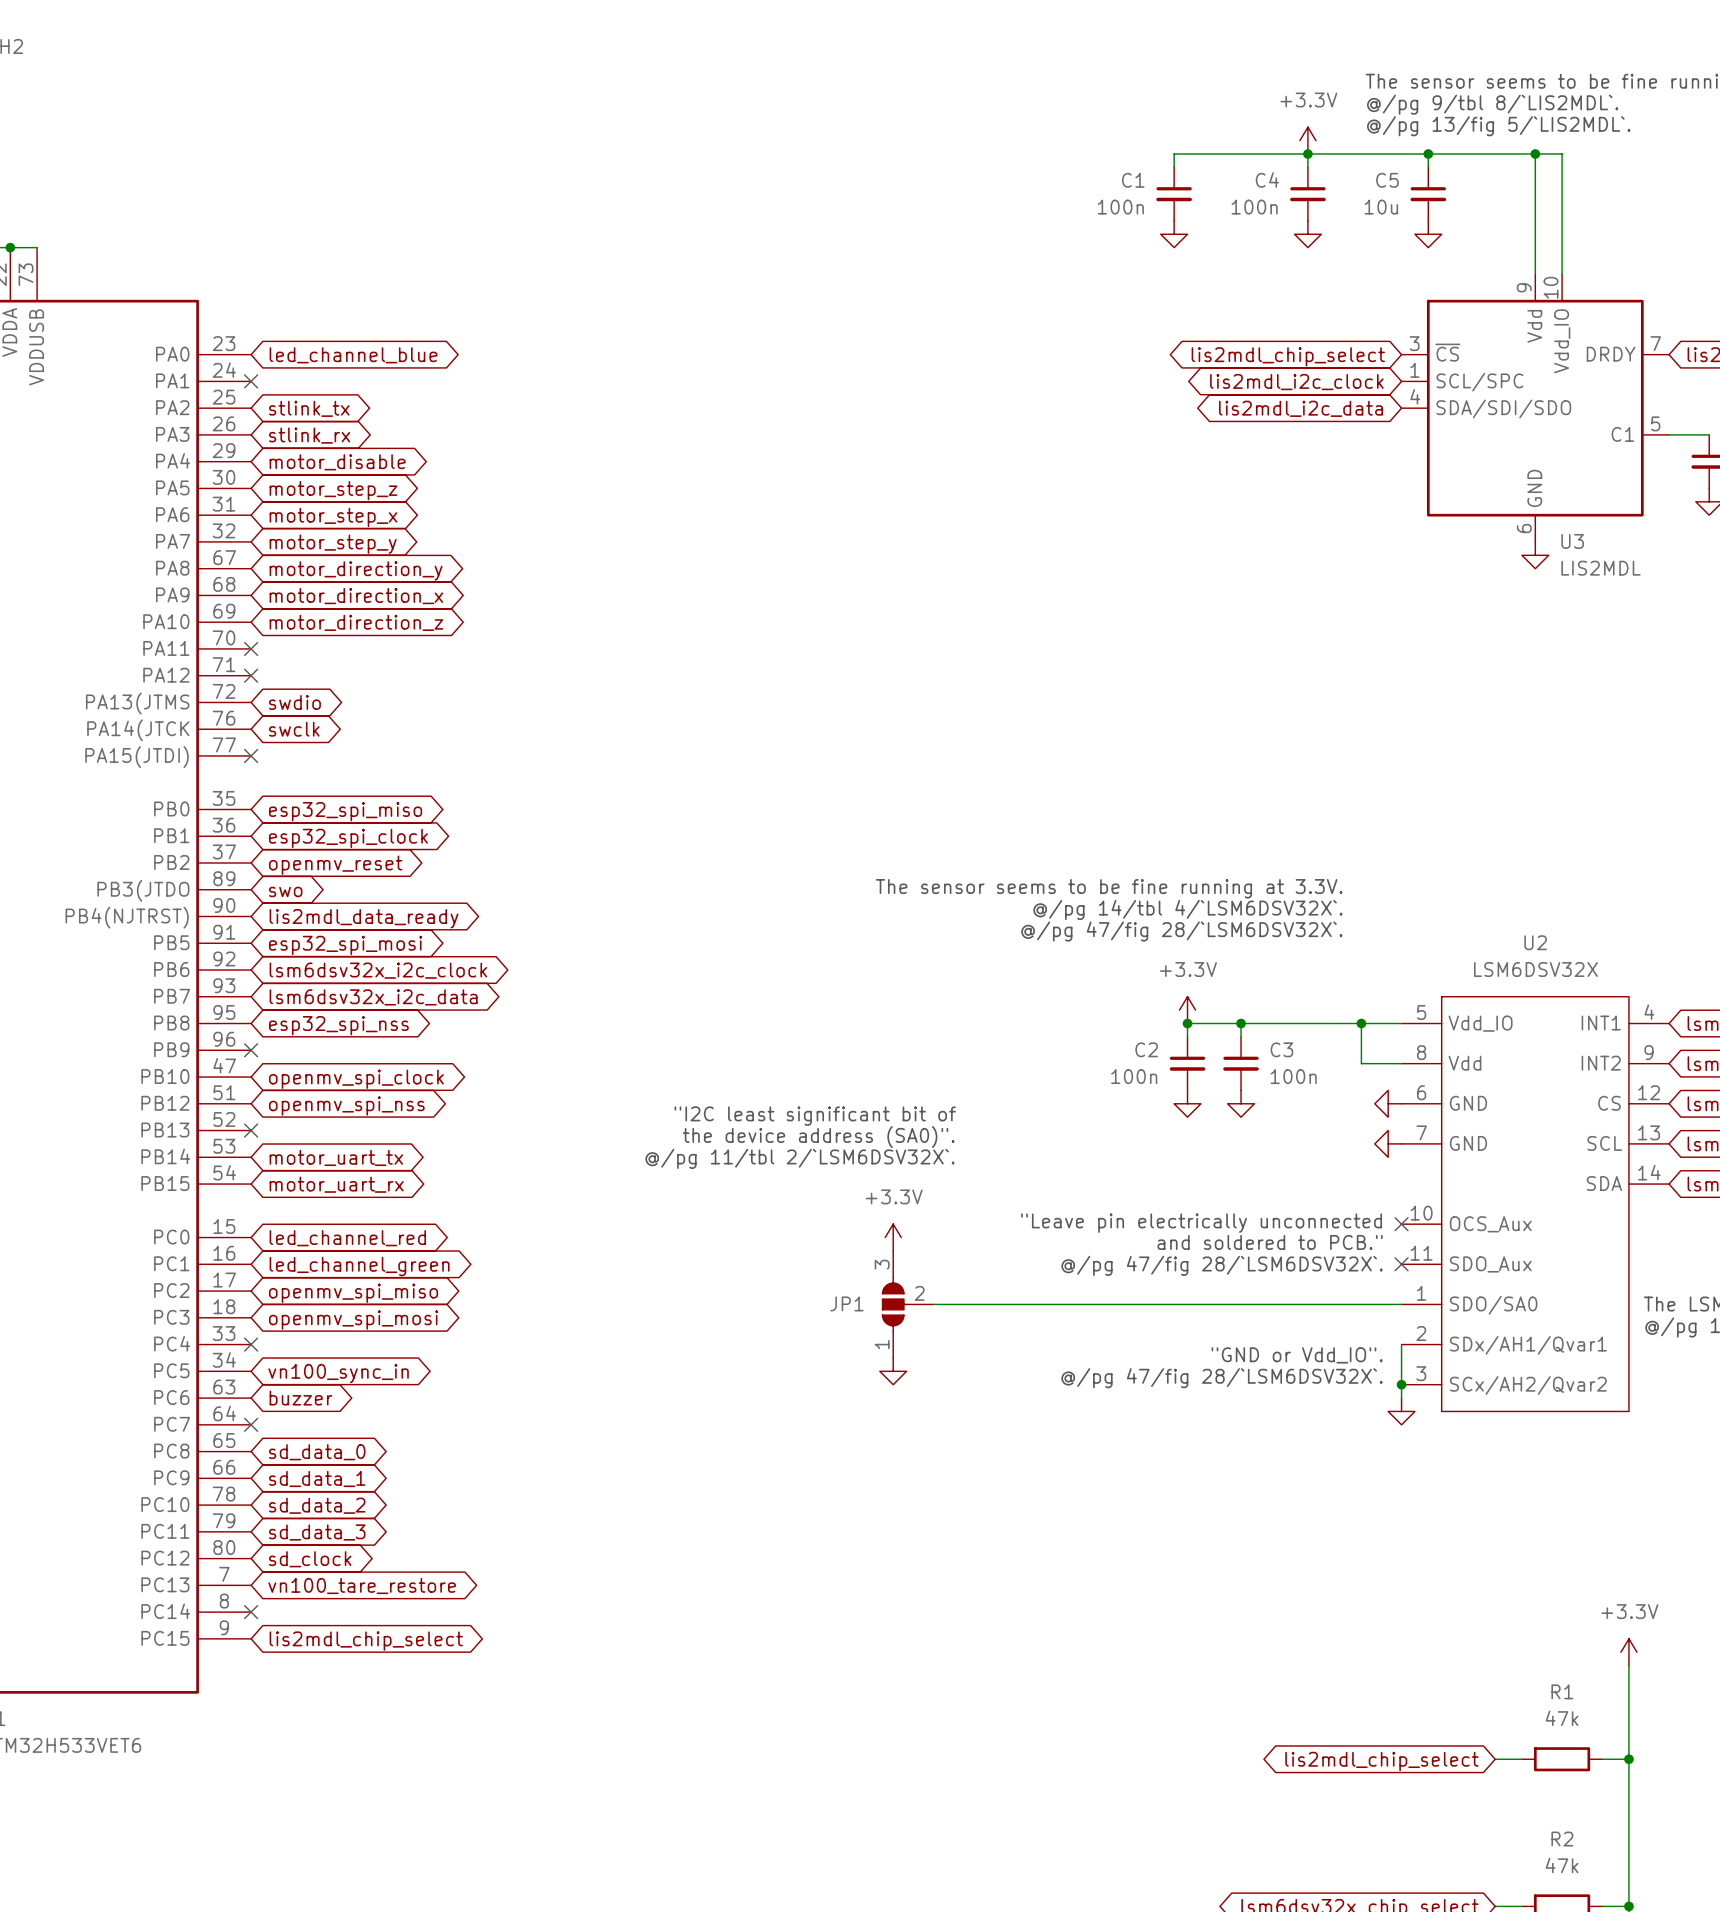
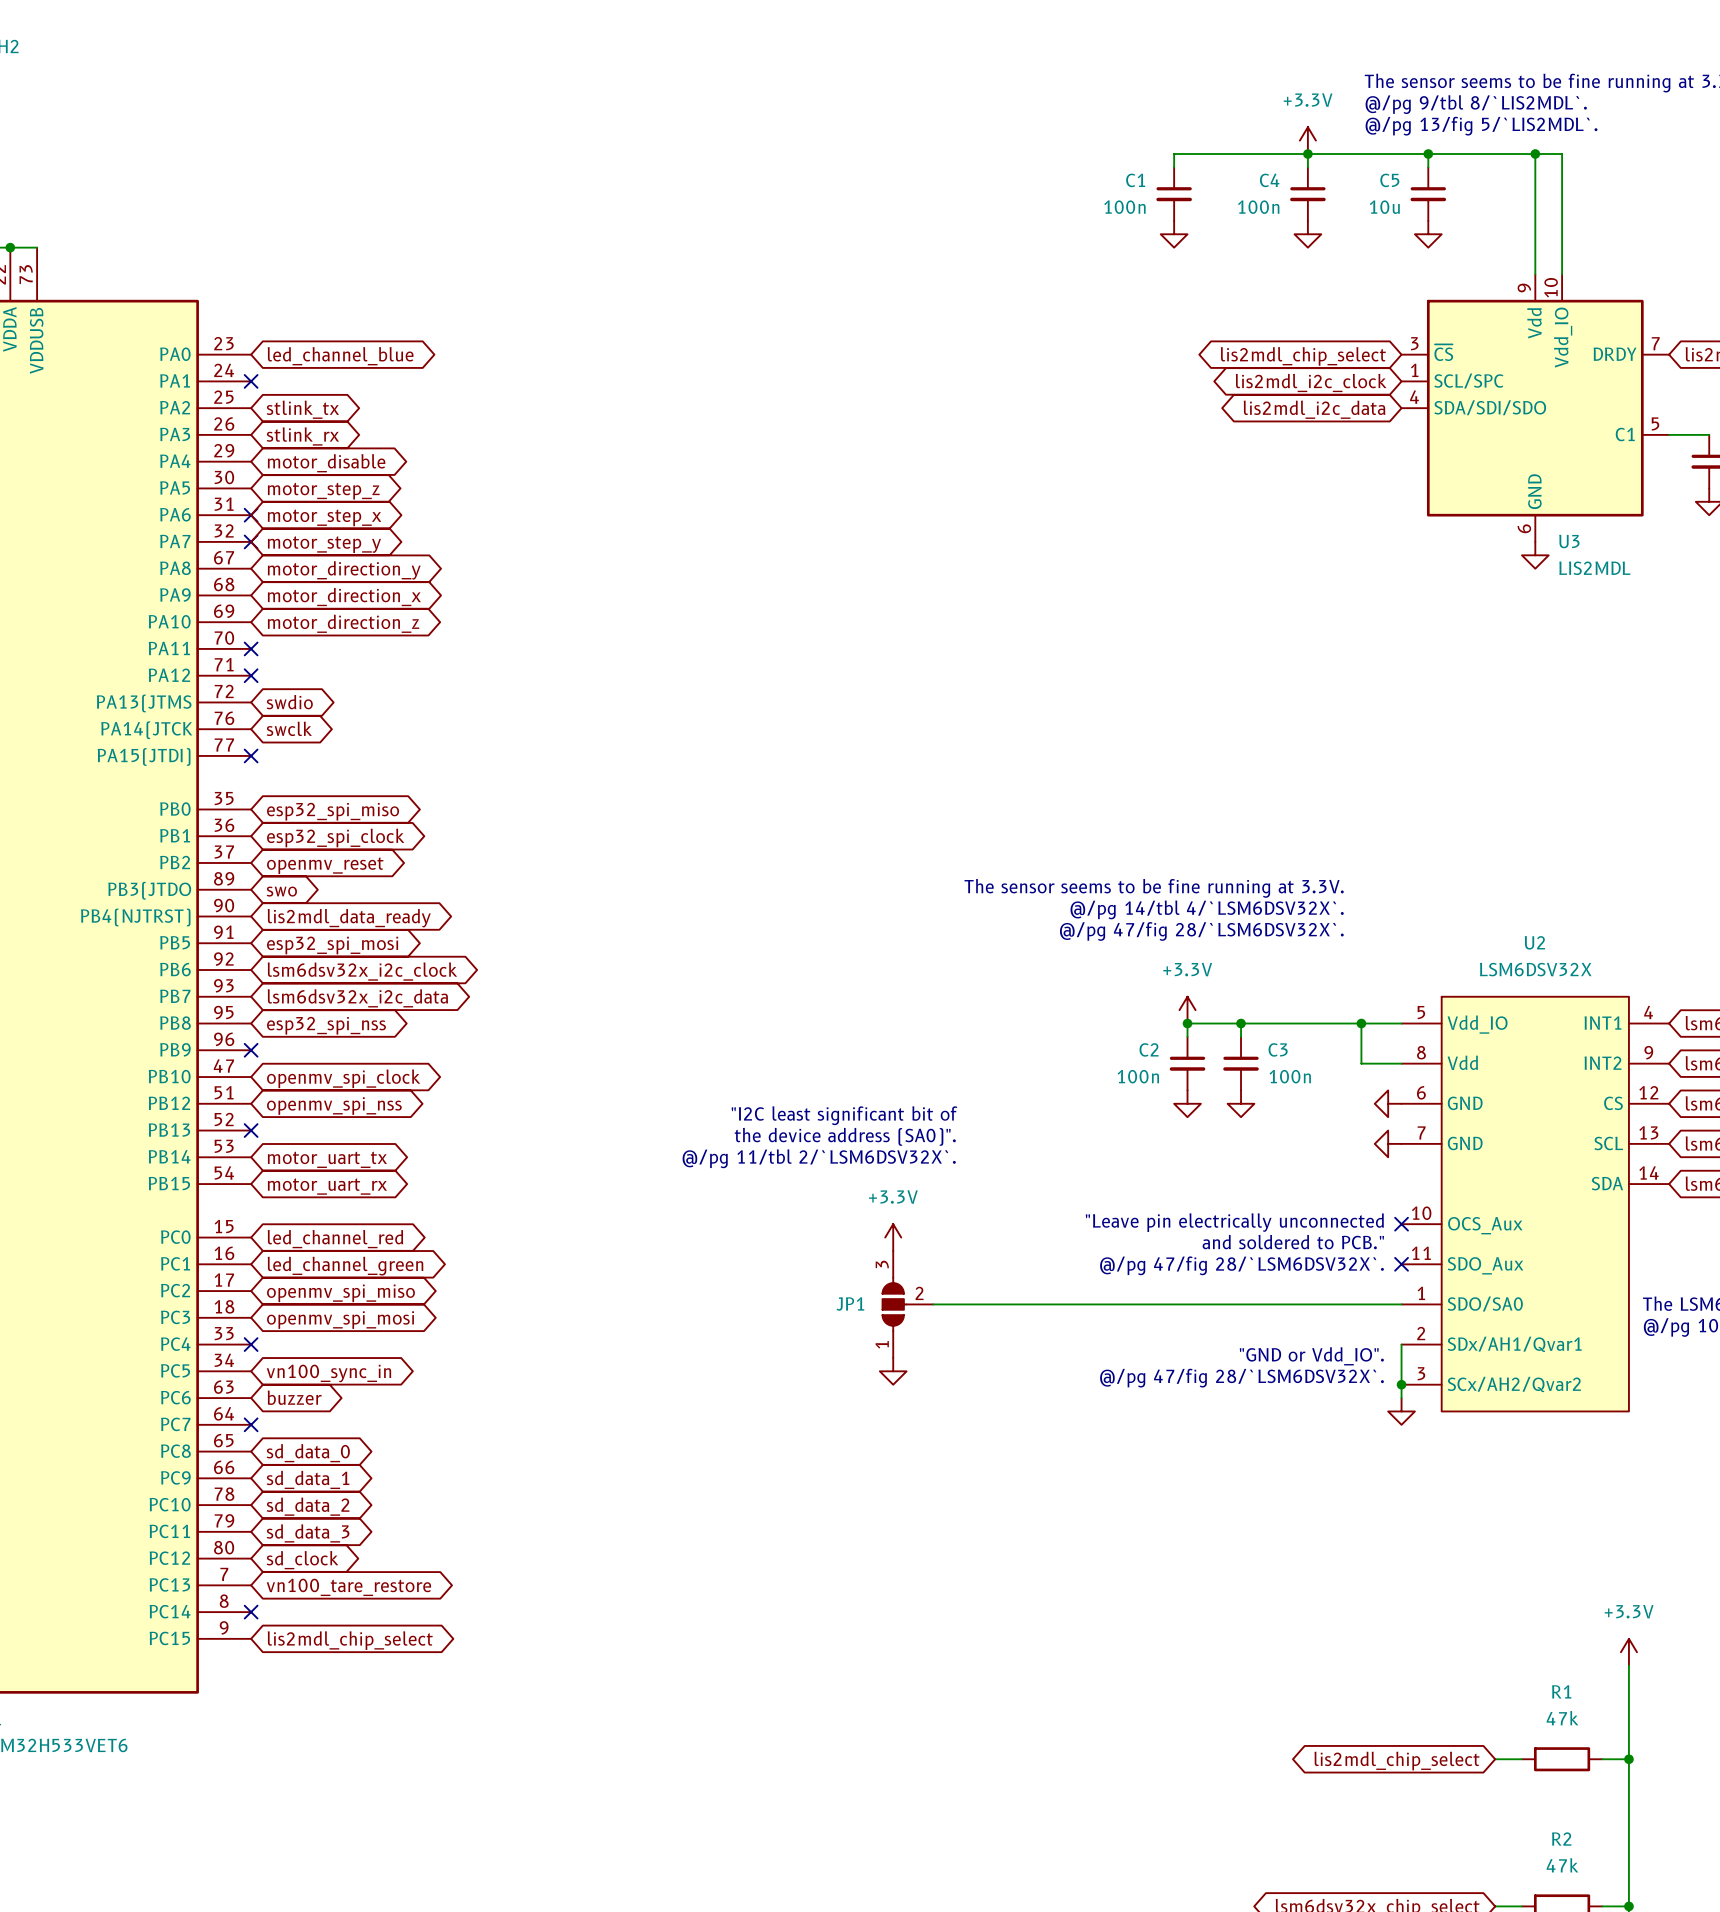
no-connect mark: none -> (251, 515)
no-connect mark: none -> (251, 541)

